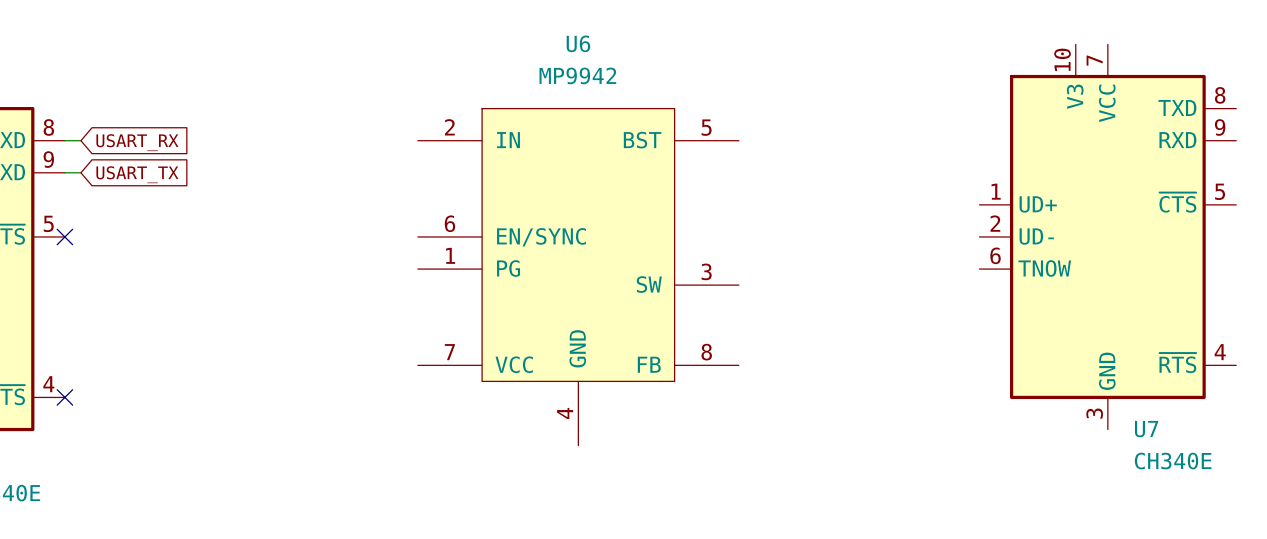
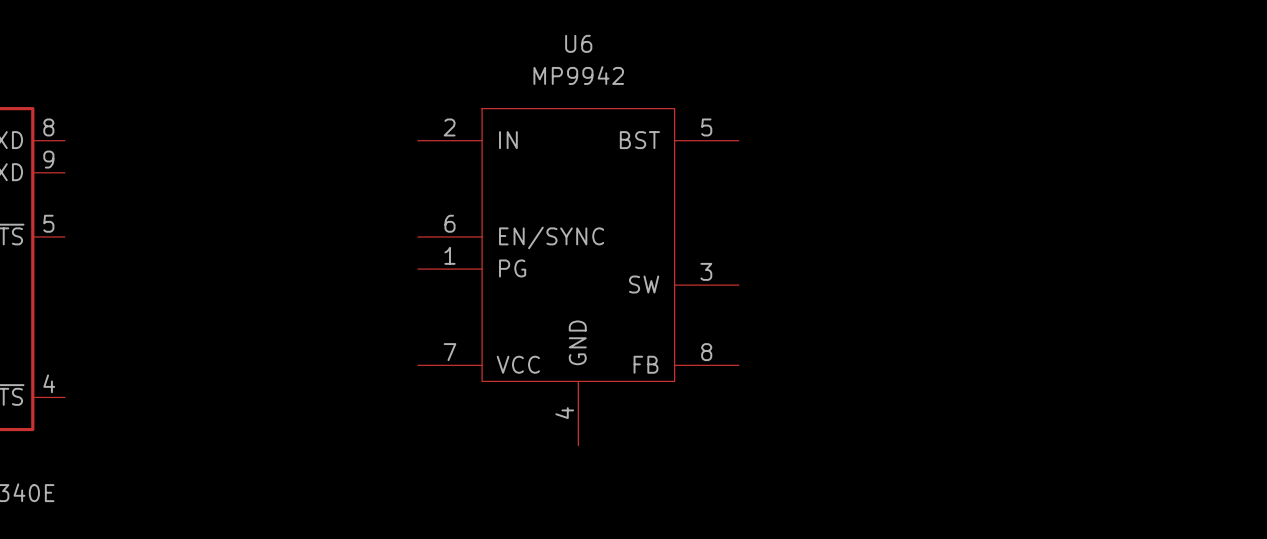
wire: (64, 140) (80, 140) -> none
global label: USART_RX (137, 142) -> none
wire: (64, 172) (80, 172) -> none
global label: USART_TX (137, 174) -> none
no-connect mark: (64, 236) -> none
U7: CH340E (1107, 236) -> none
no-connect mark: (64, 397) -> none

